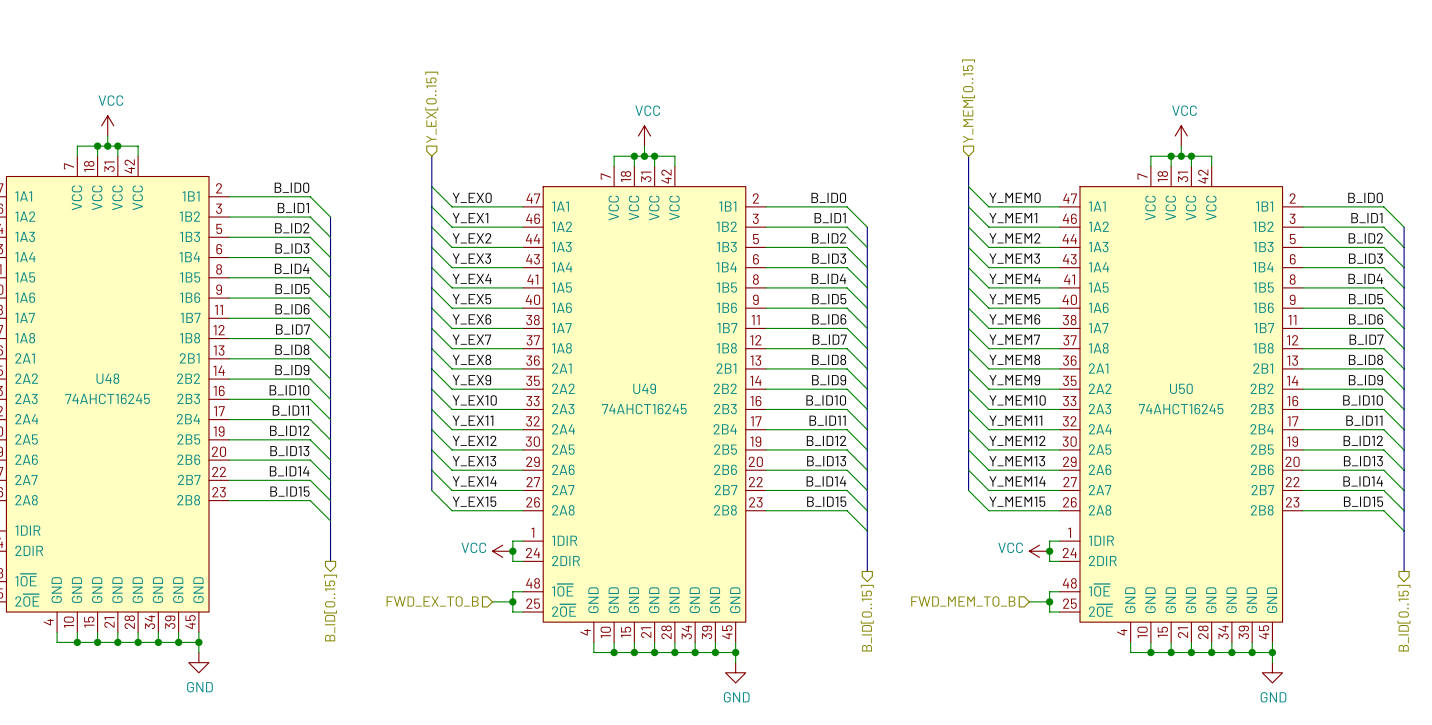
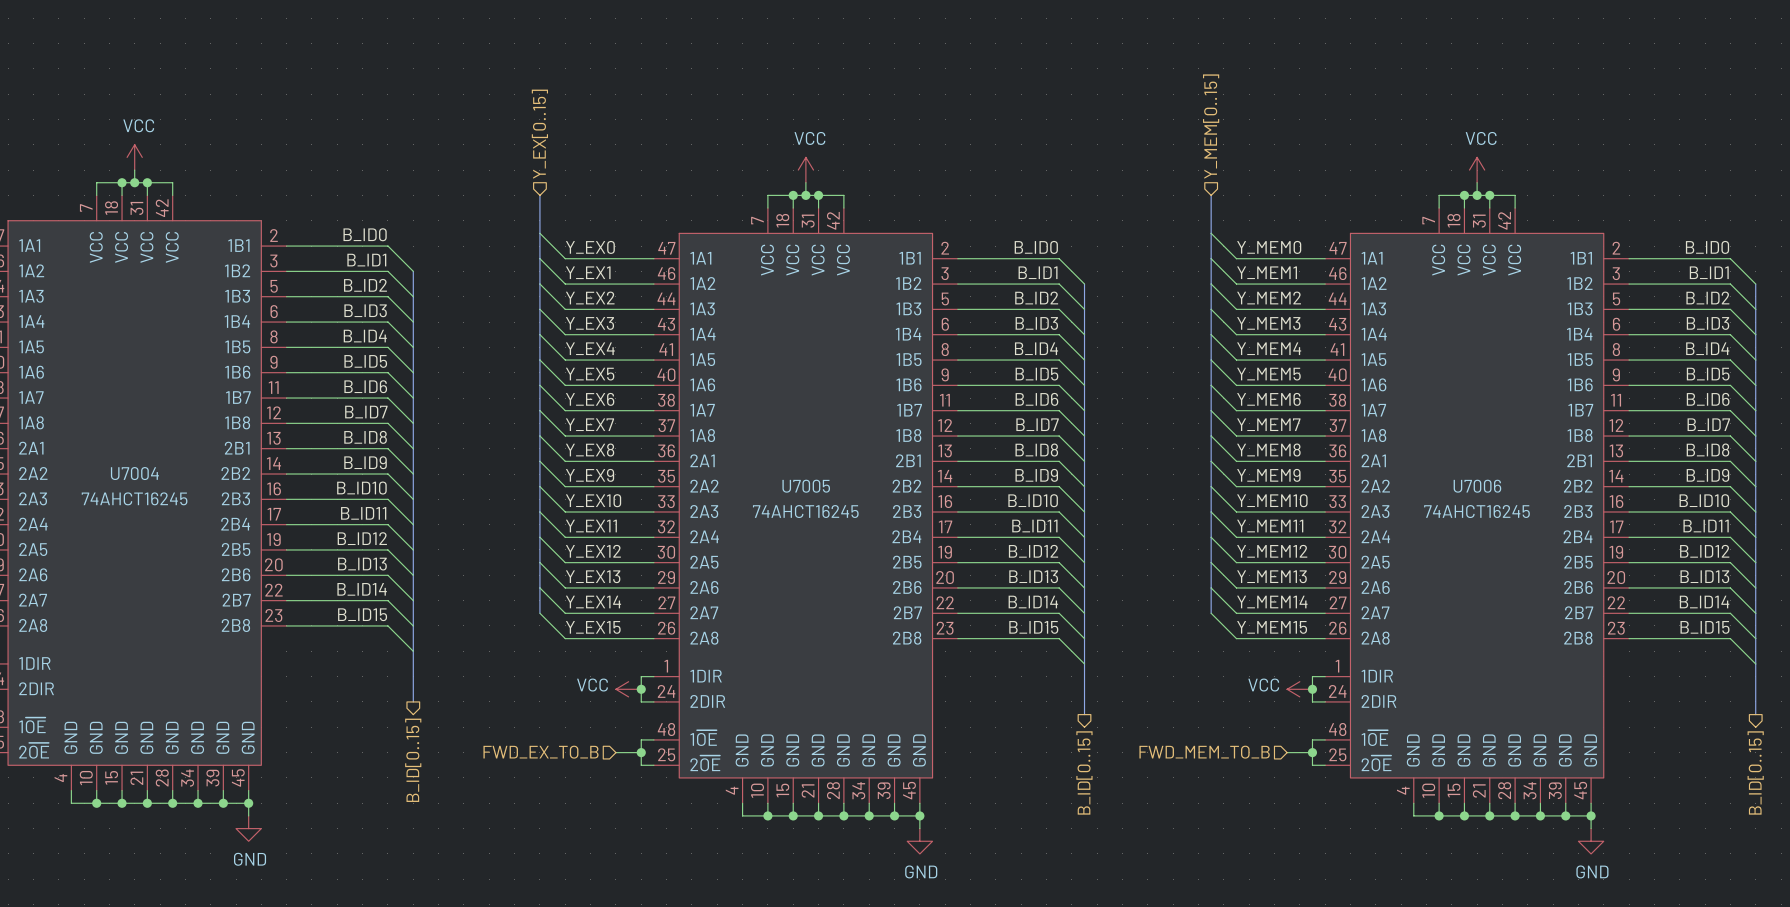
U48 name: U48 (107, 378) -> U7004 (134, 473)
U49 name: U49 (644, 388) -> U7005 (806, 486)
U50 name: U50 (1181, 388) -> U7006 (1477, 486)

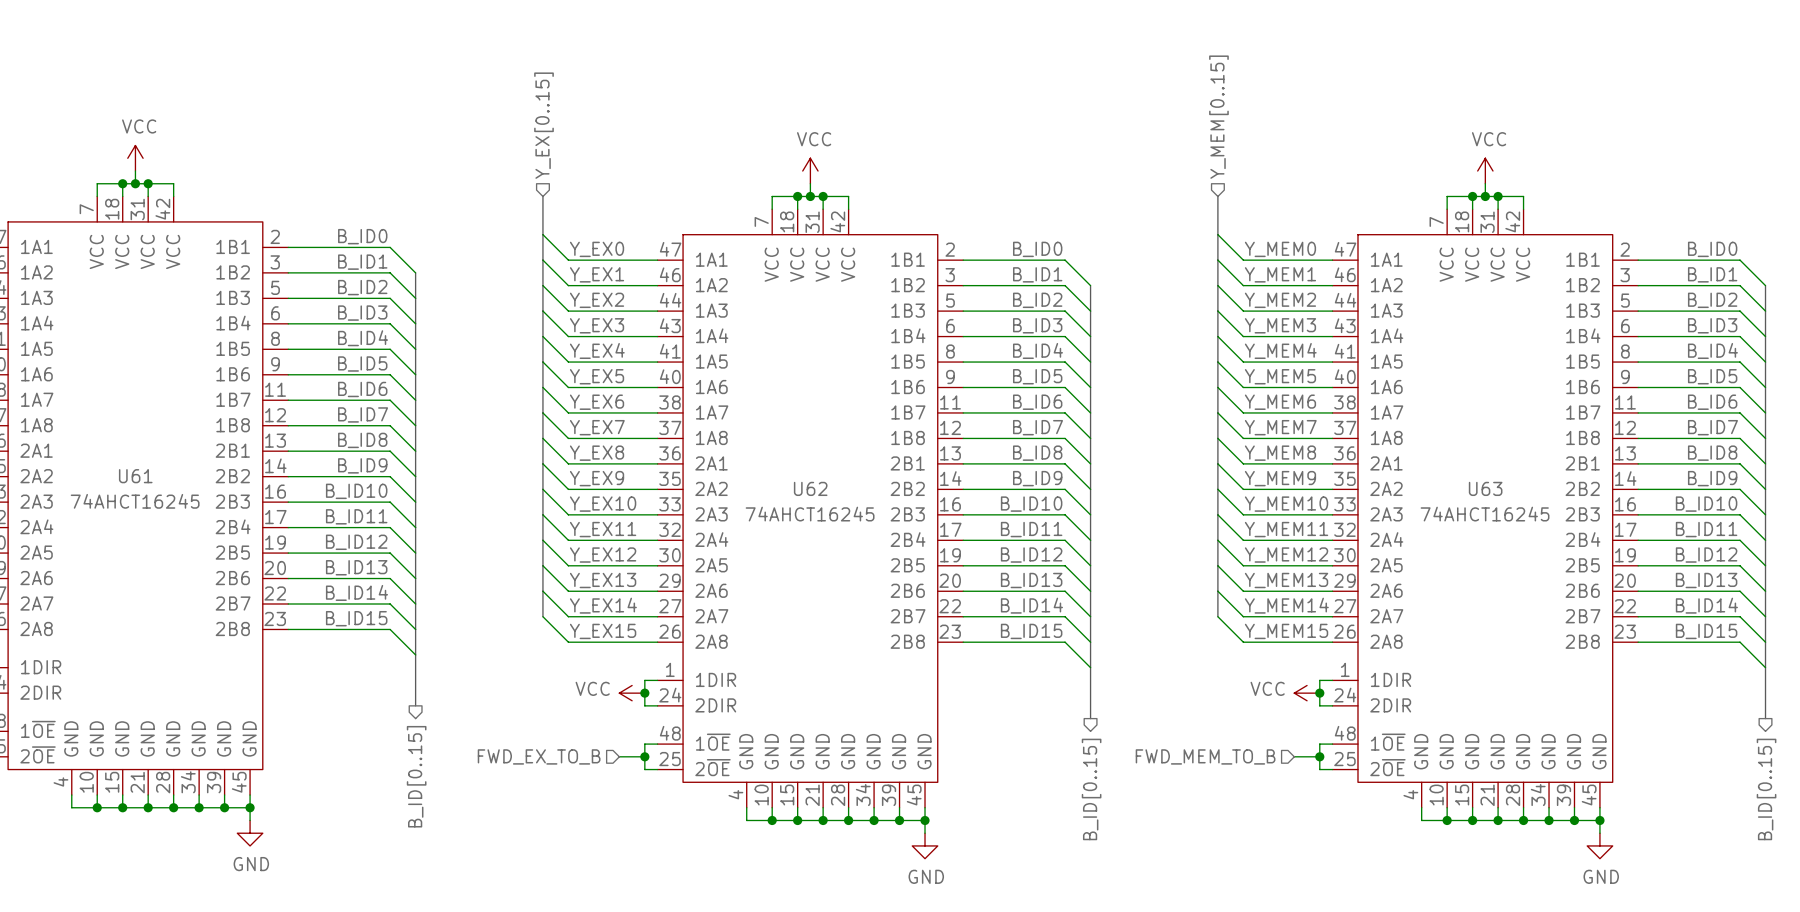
U7004 name: U7004 (134, 473) -> U61 (135, 476)
U7005 name: U7005 (806, 486) -> U62 (810, 488)
U7006 name: U7006 (1477, 486) -> U63 (1485, 488)

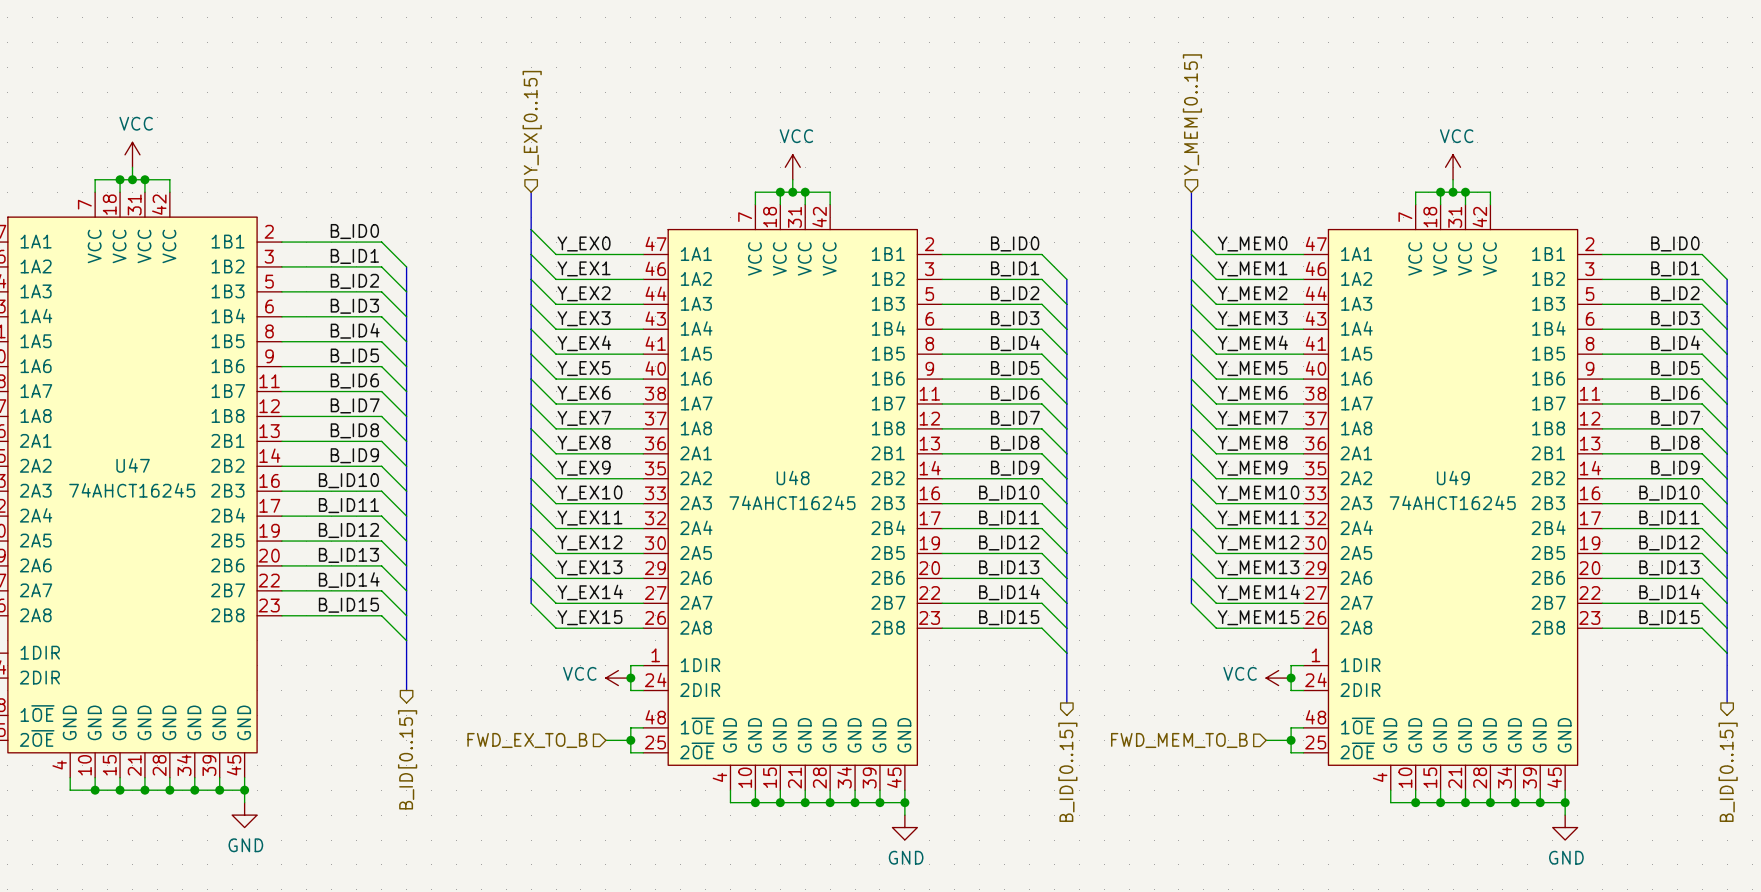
U61 name: U61 (135, 476) -> U47 (133, 465)
U62 name: U62 (810, 488) -> U48 (793, 477)
U63 name: U63 (1485, 488) -> U49 (1453, 477)

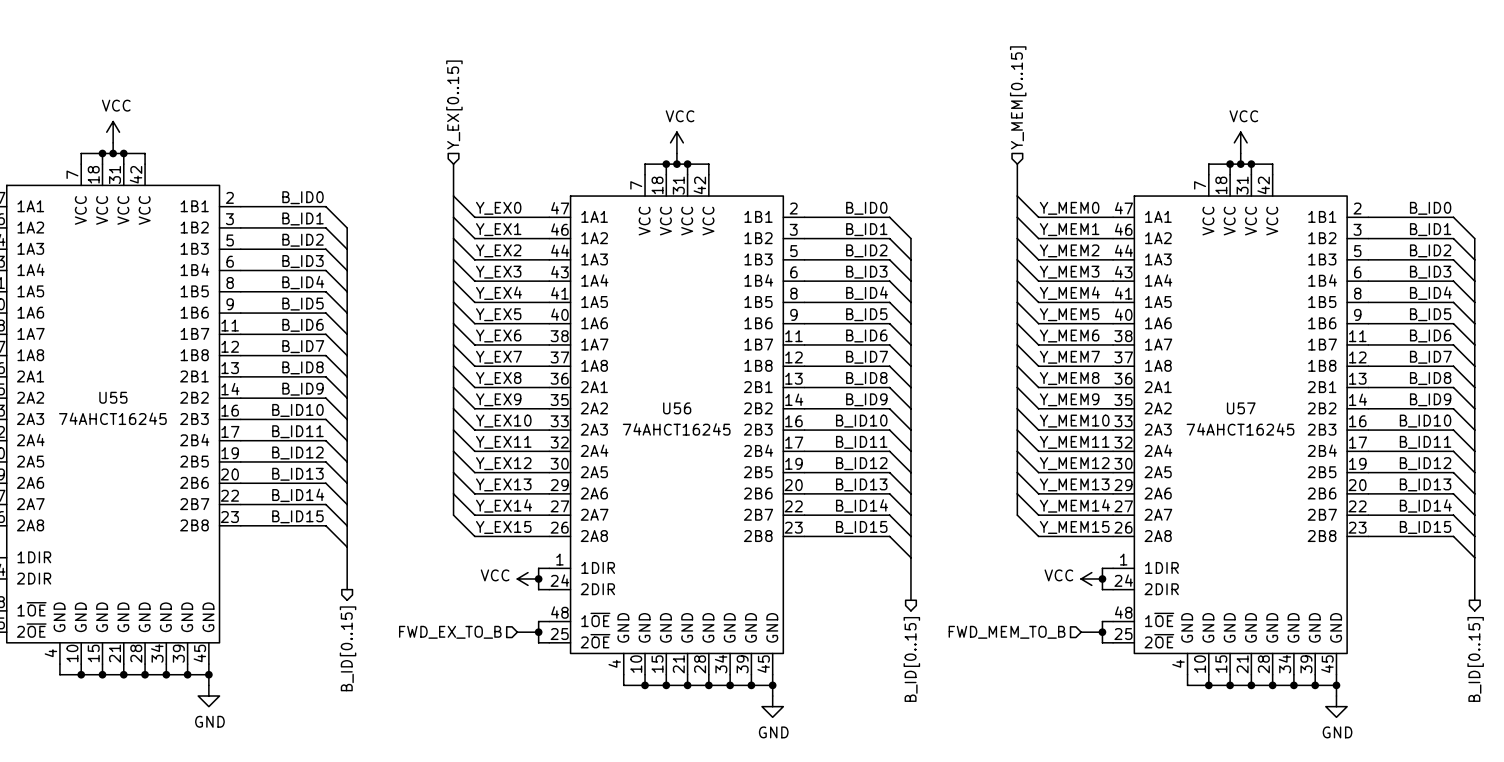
U47 name: U47 (133, 465) -> U55 (113, 397)
U48 name: U48 (793, 477) -> U56 (677, 408)
U49 name: U49 (1453, 477) -> U57 (1241, 408)

